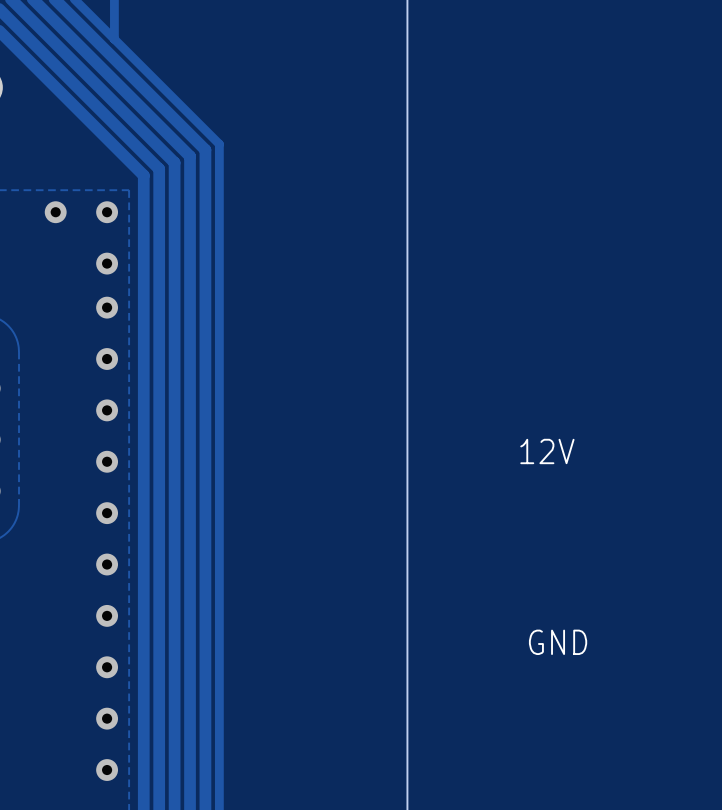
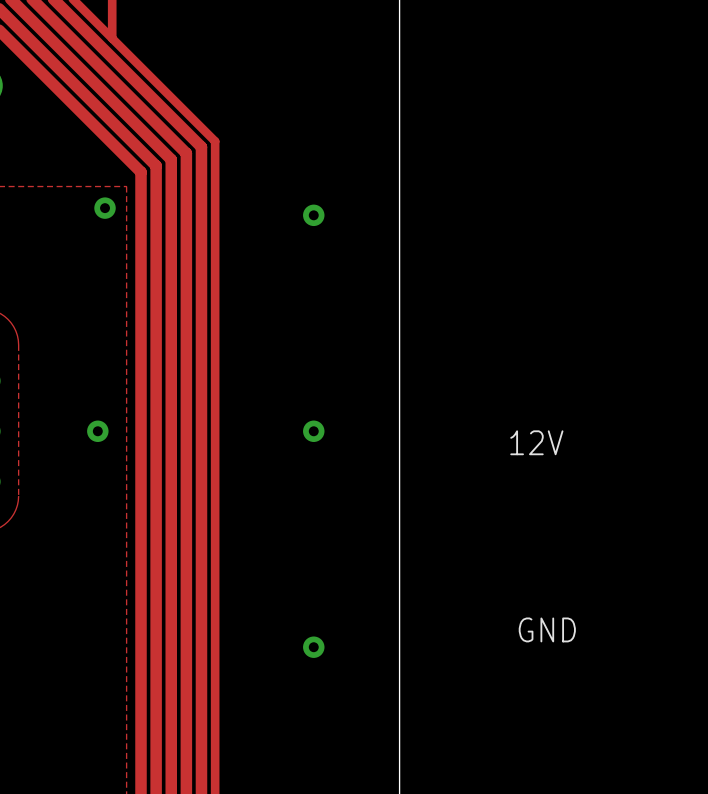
via: (55, 212) -> none
via: none -> (313, 215)
via: (107, 263) -> none
via: (107, 307) -> none
via: (107, 359) -> none
via: (107, 410) -> none
via: none -> (97, 431)
via: none -> (313, 431)
via: (107, 461) -> none
via: (107, 513) -> none
via: (107, 564) -> none
via: (107, 615) -> none
via: none -> (313, 647)
via: (107, 667) -> none
via: (107, 718) -> none
via: (107, 770) -> none

